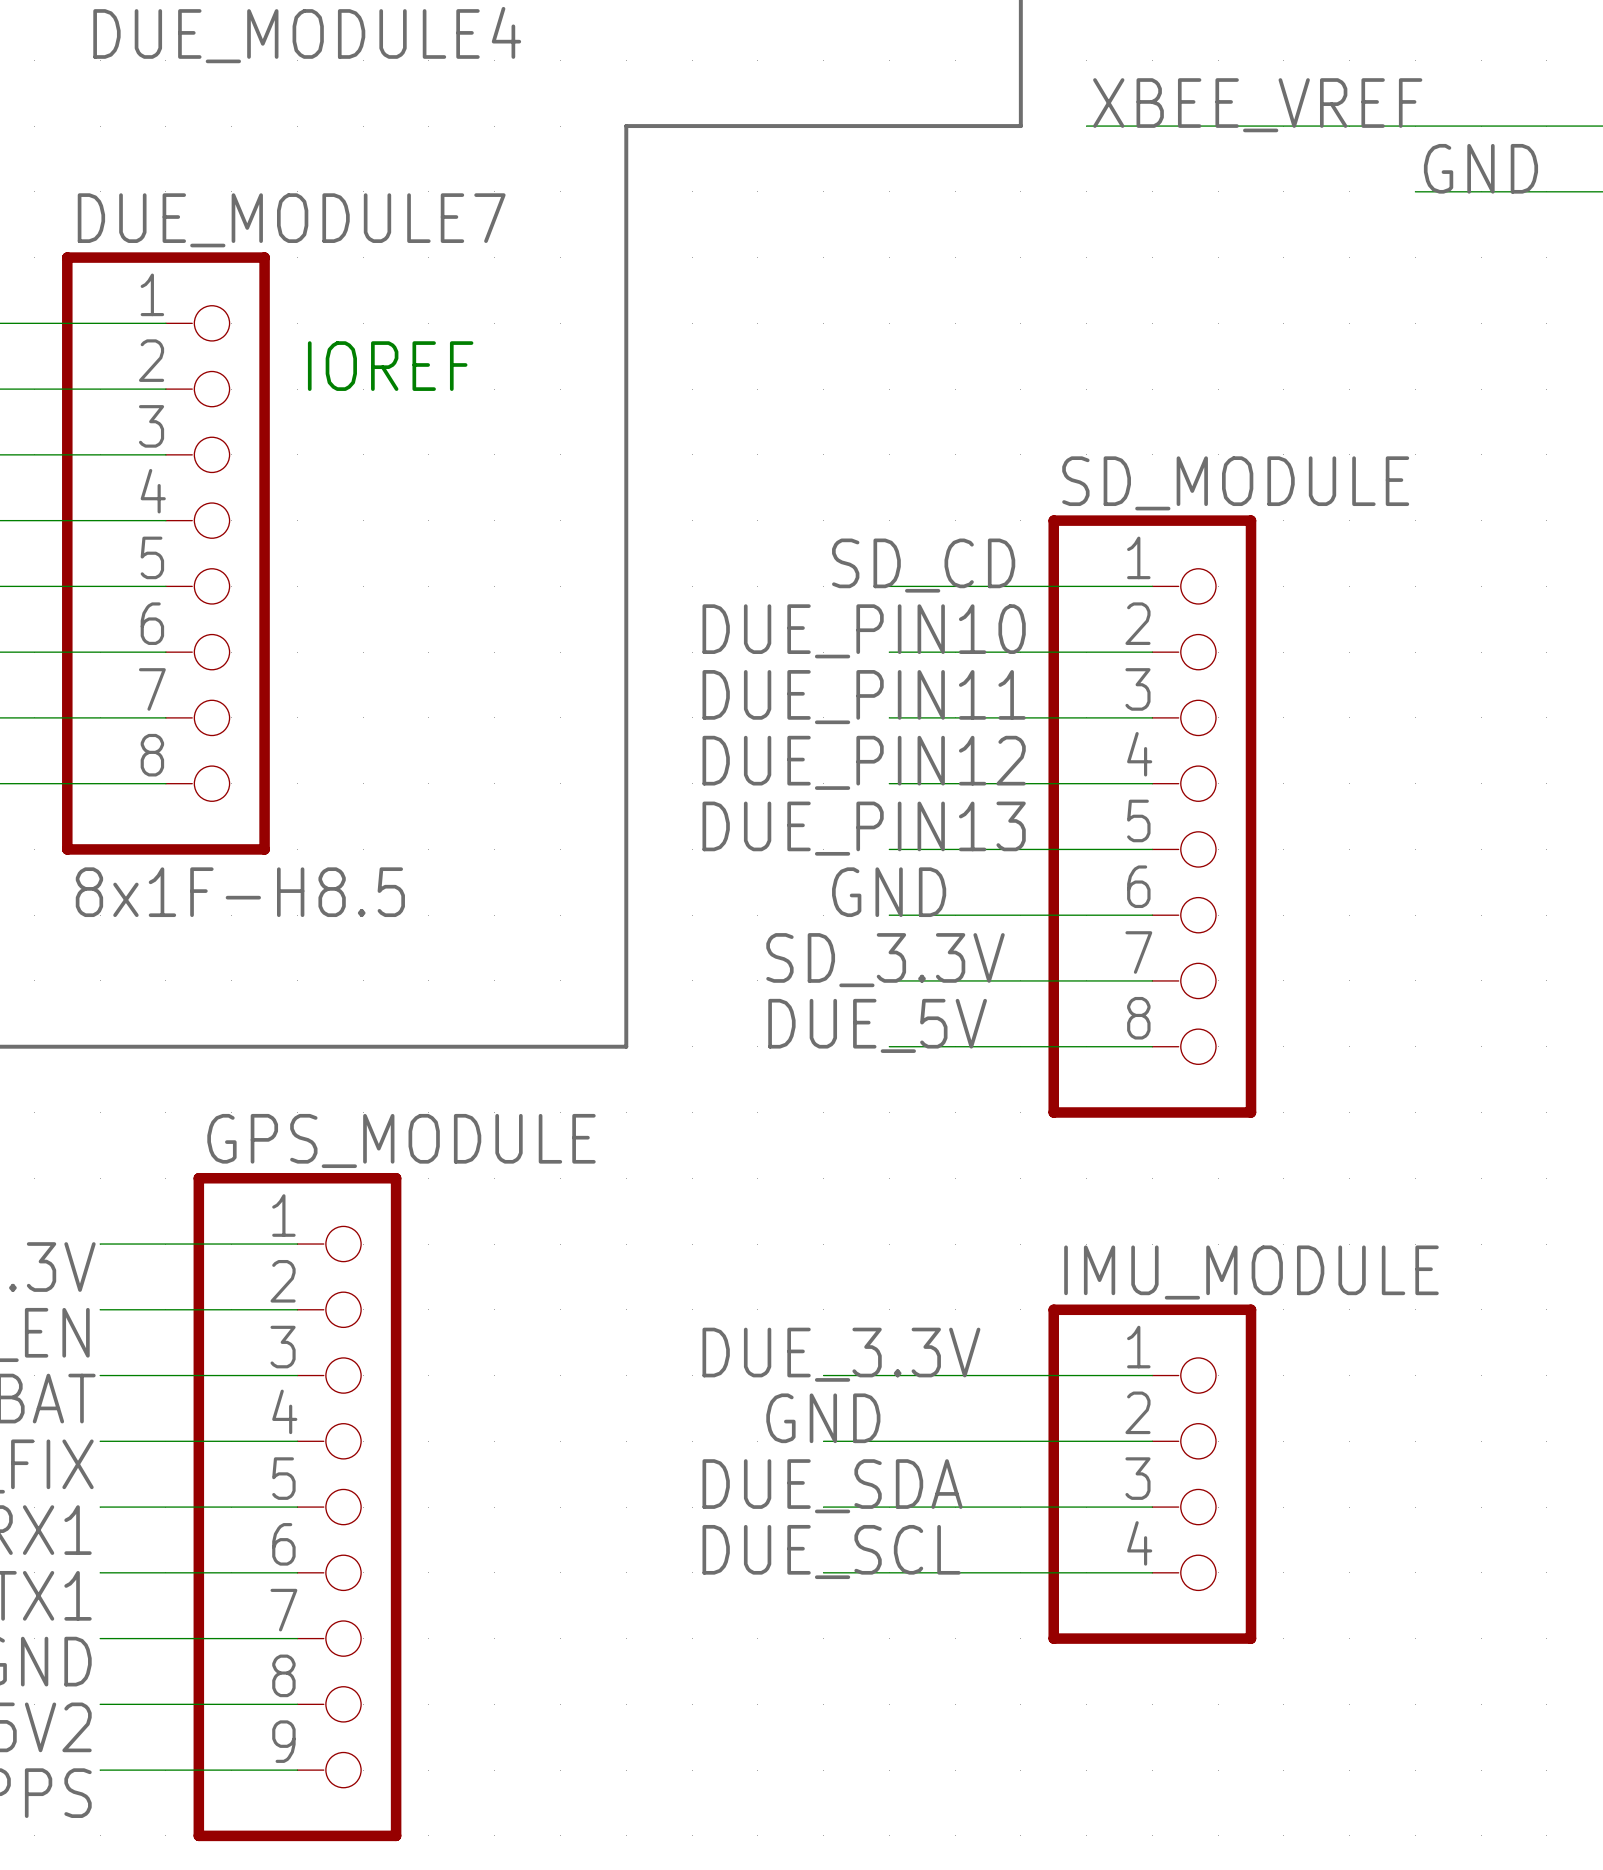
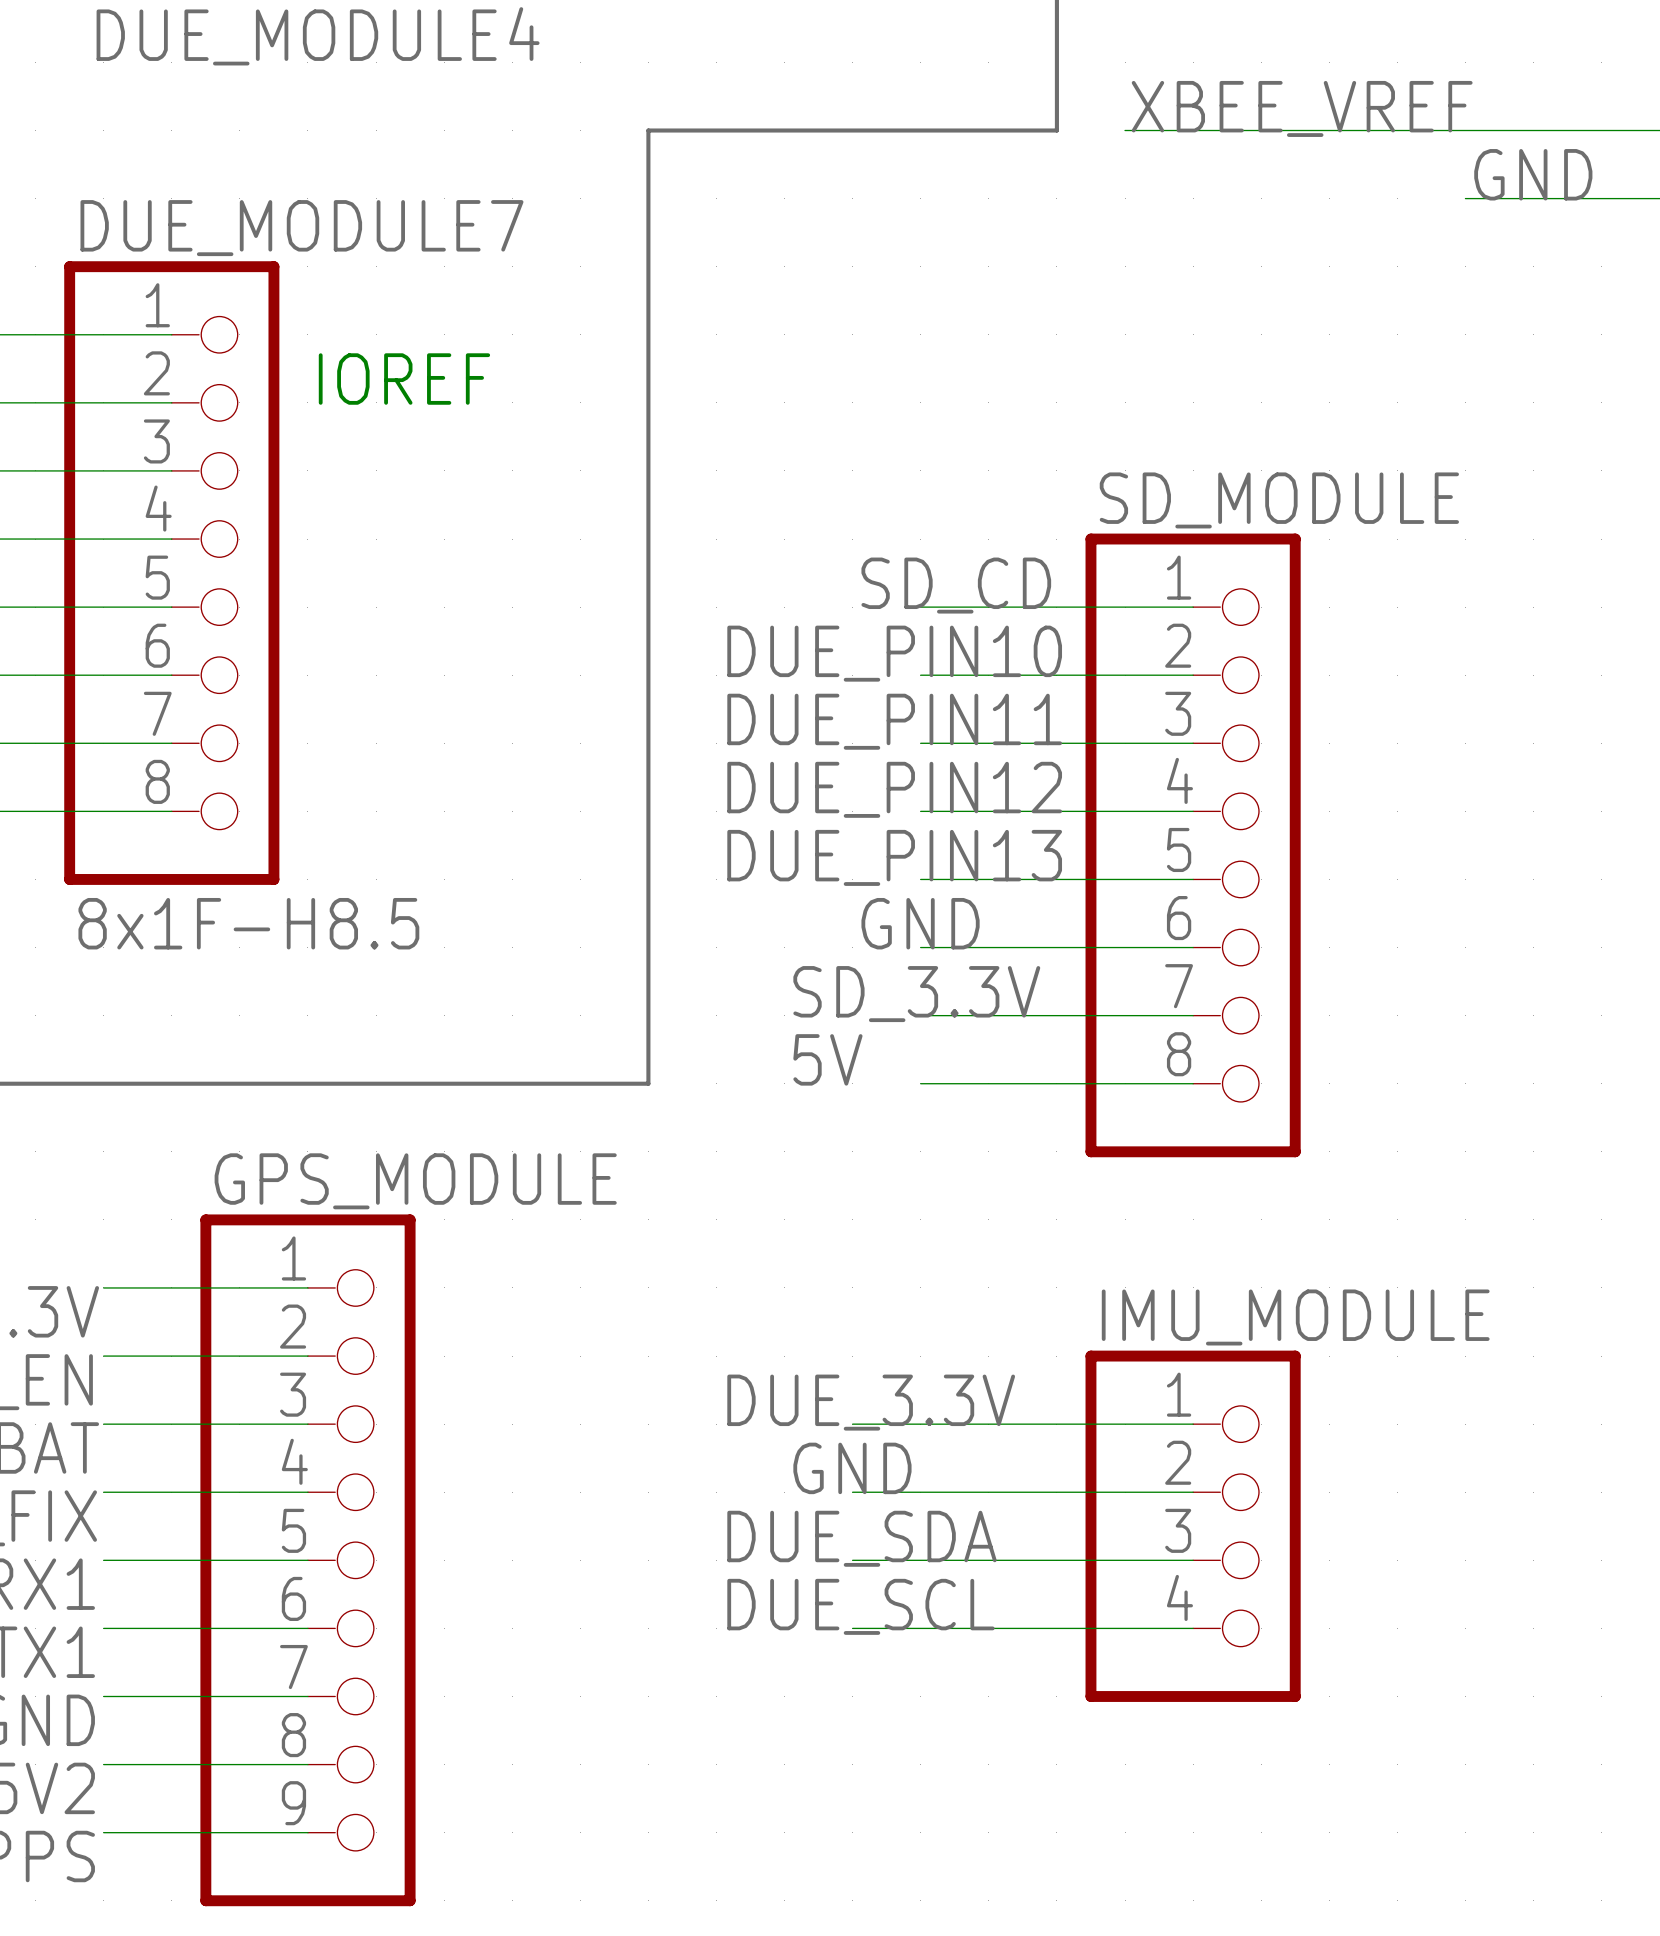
label: DUE_5V (877, 1025) -> 5V (827, 1059)

